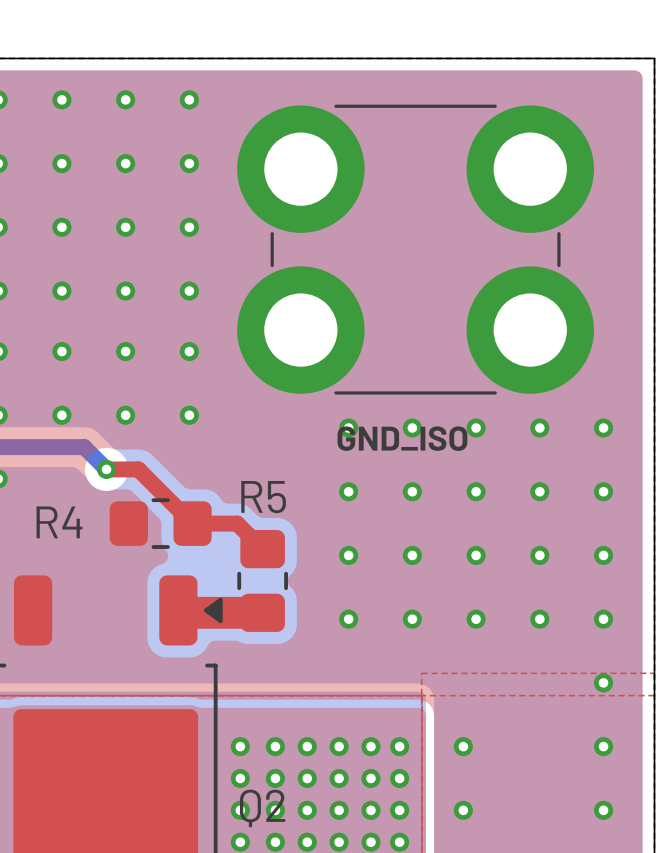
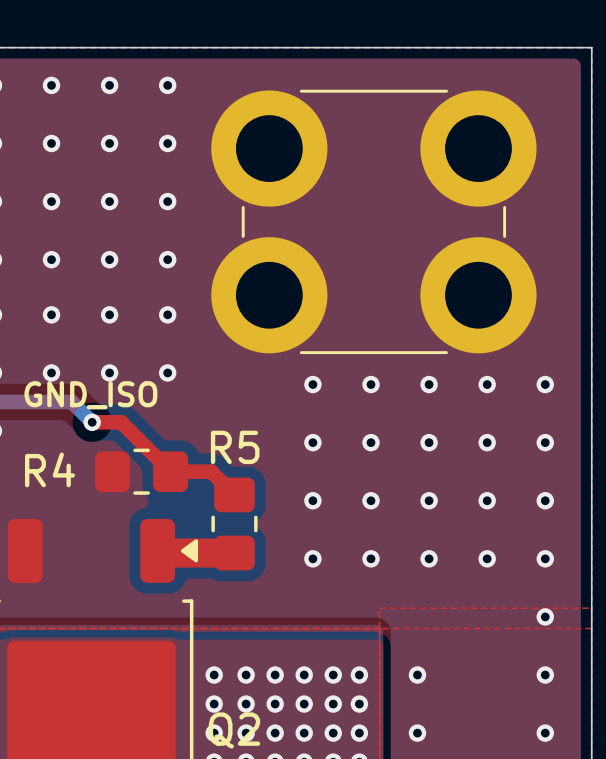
text position: GND_ISO (402, 438) -> GND_ISO (90, 395)

